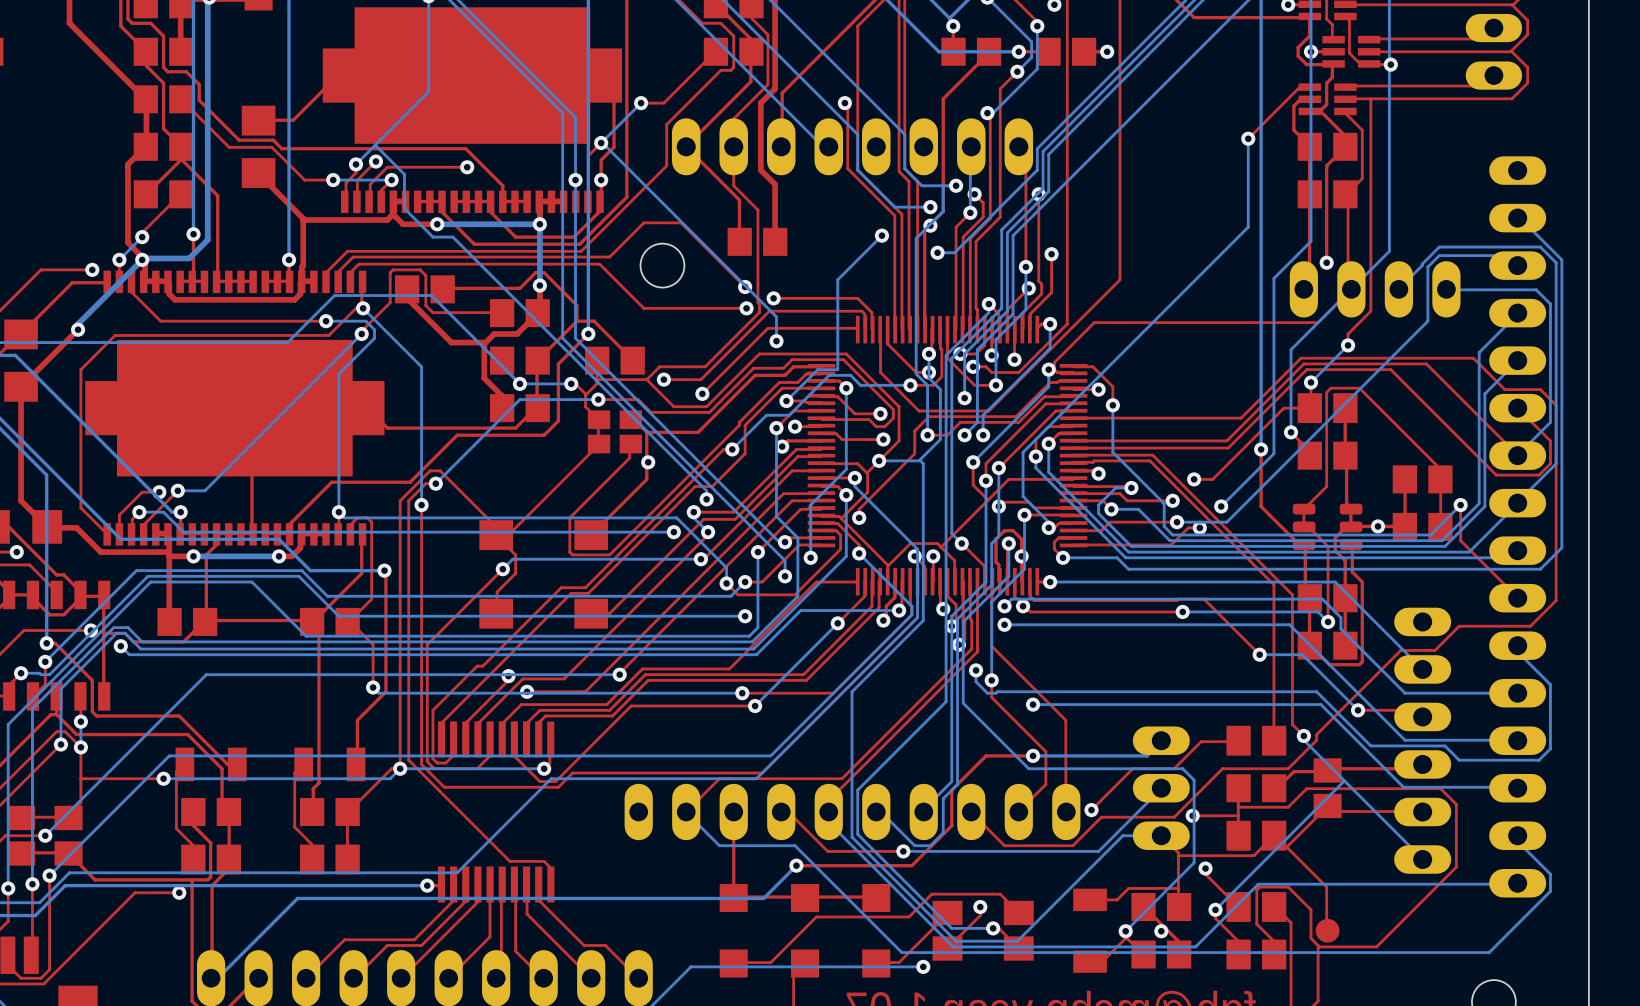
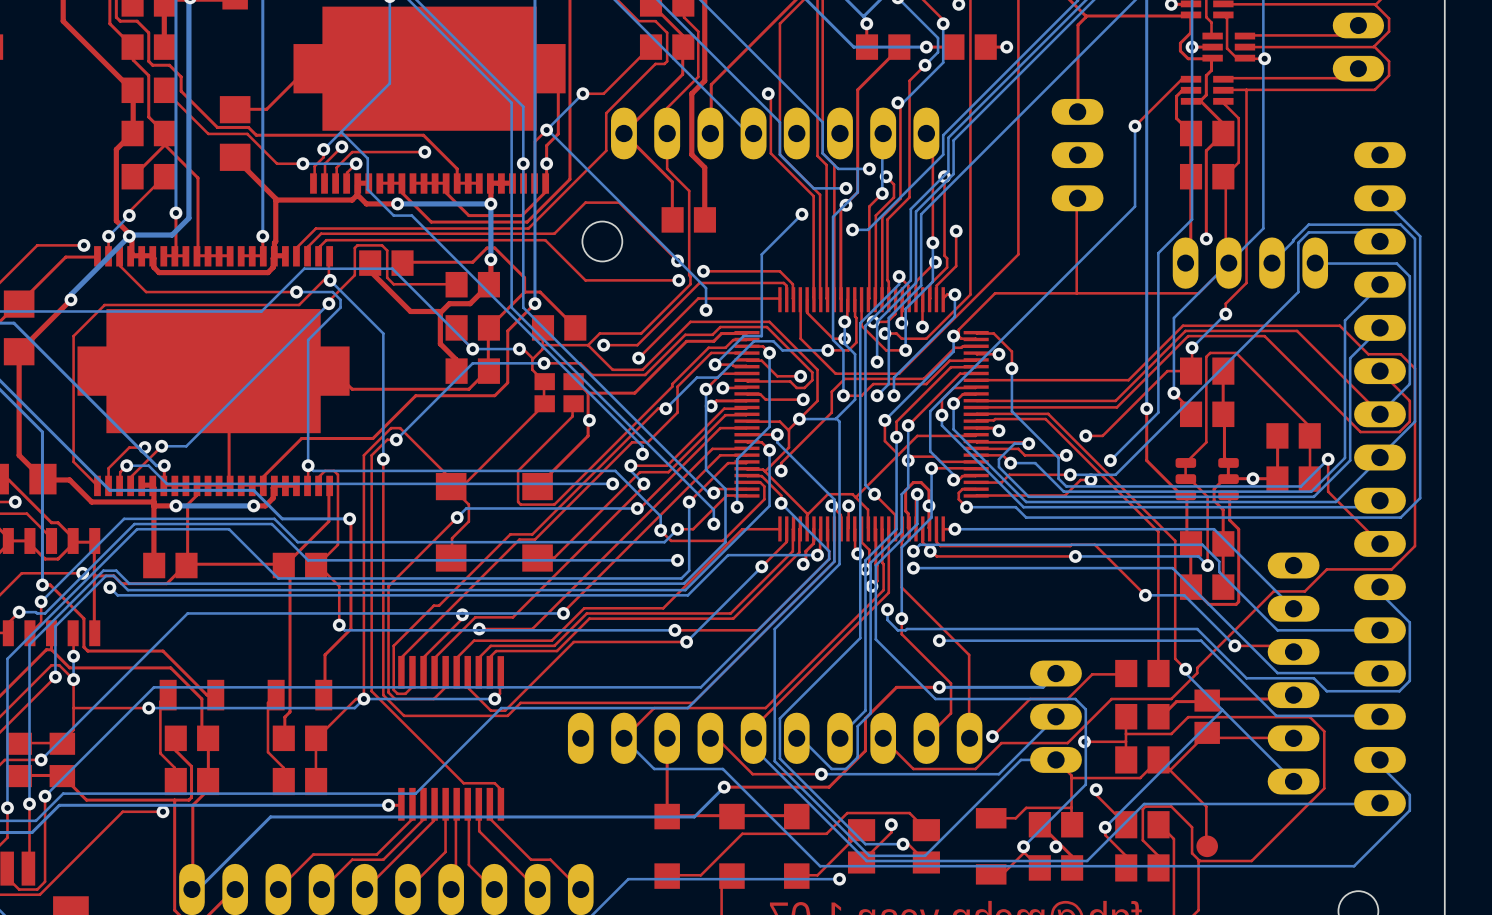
top track: none -> (1085, 15) (1078, 25) (1077, 111)
part: none -> (1077, 155)
top track: none -> (1077, 198) (1076, 293)

